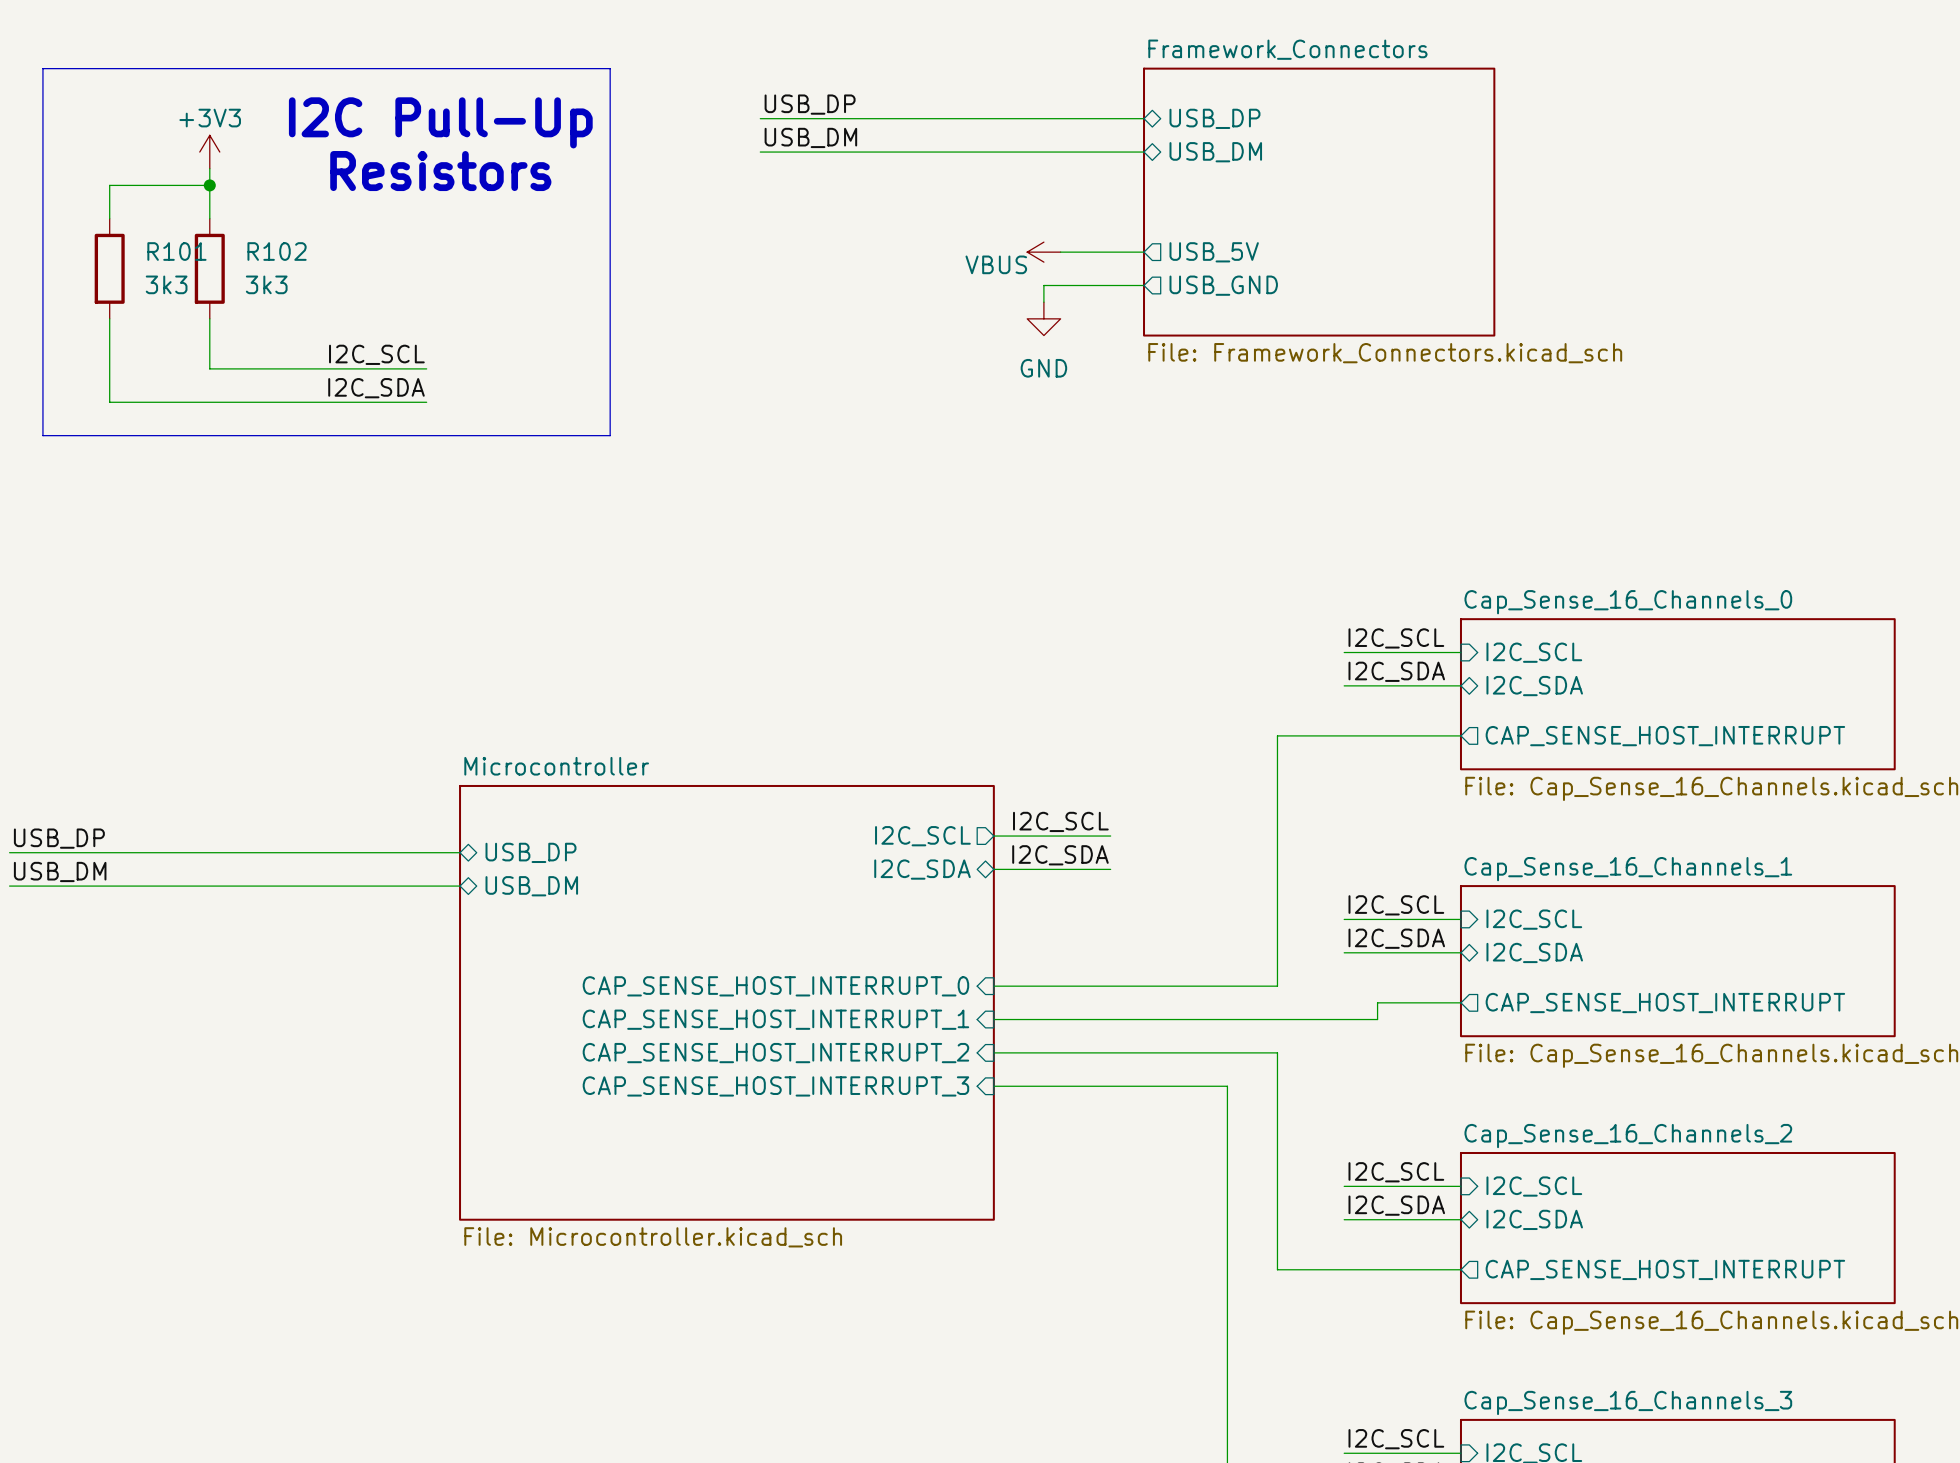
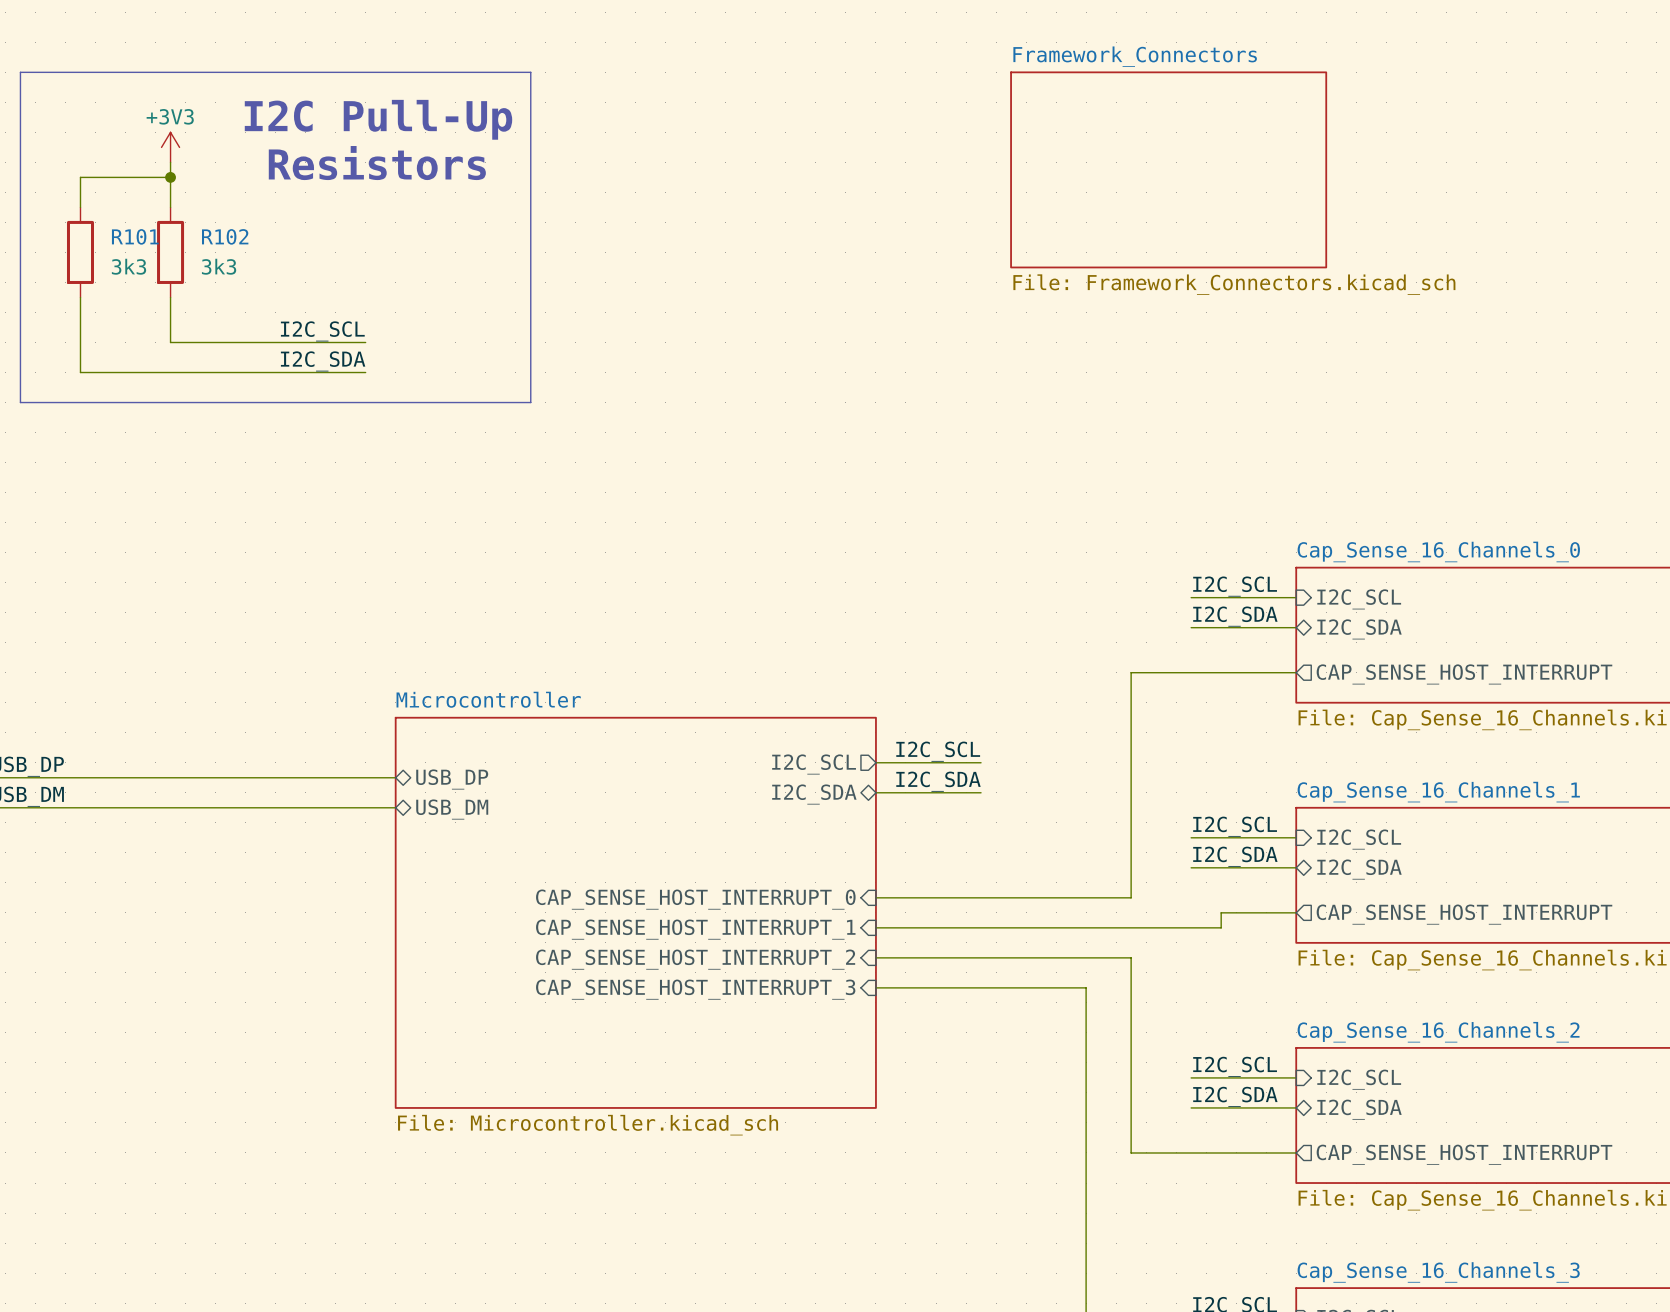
label: USB_DP (810, 104) -> none
wire: (760, 118) (1144, 118) -> none
sheet pin: USB_DP (1214, 118) -> none
label: USB_DM (810, 137) -> none
wire: (760, 152) (1144, 152) -> none
sheet pin: USB_DM (1215, 152) -> none
sheet Framework_Connectors: none -> File: Framework_Connectors.kicad_sch (1168, 169)
sheet Framework_Connectors: File: Framework_Connectors.kicad_sch (1319, 202) -> none
power symbol: VBUS (1043, 252) -> none
wire: (1060, 252) (1144, 252) -> none
sheet pin: USB_5V (1214, 252) -> none
wire: (1144, 285) (1043, 285) (1043, 302) -> none
sheet pin: USB_GND (1223, 285) -> none
power symbol: GND (1043, 318) -> none

